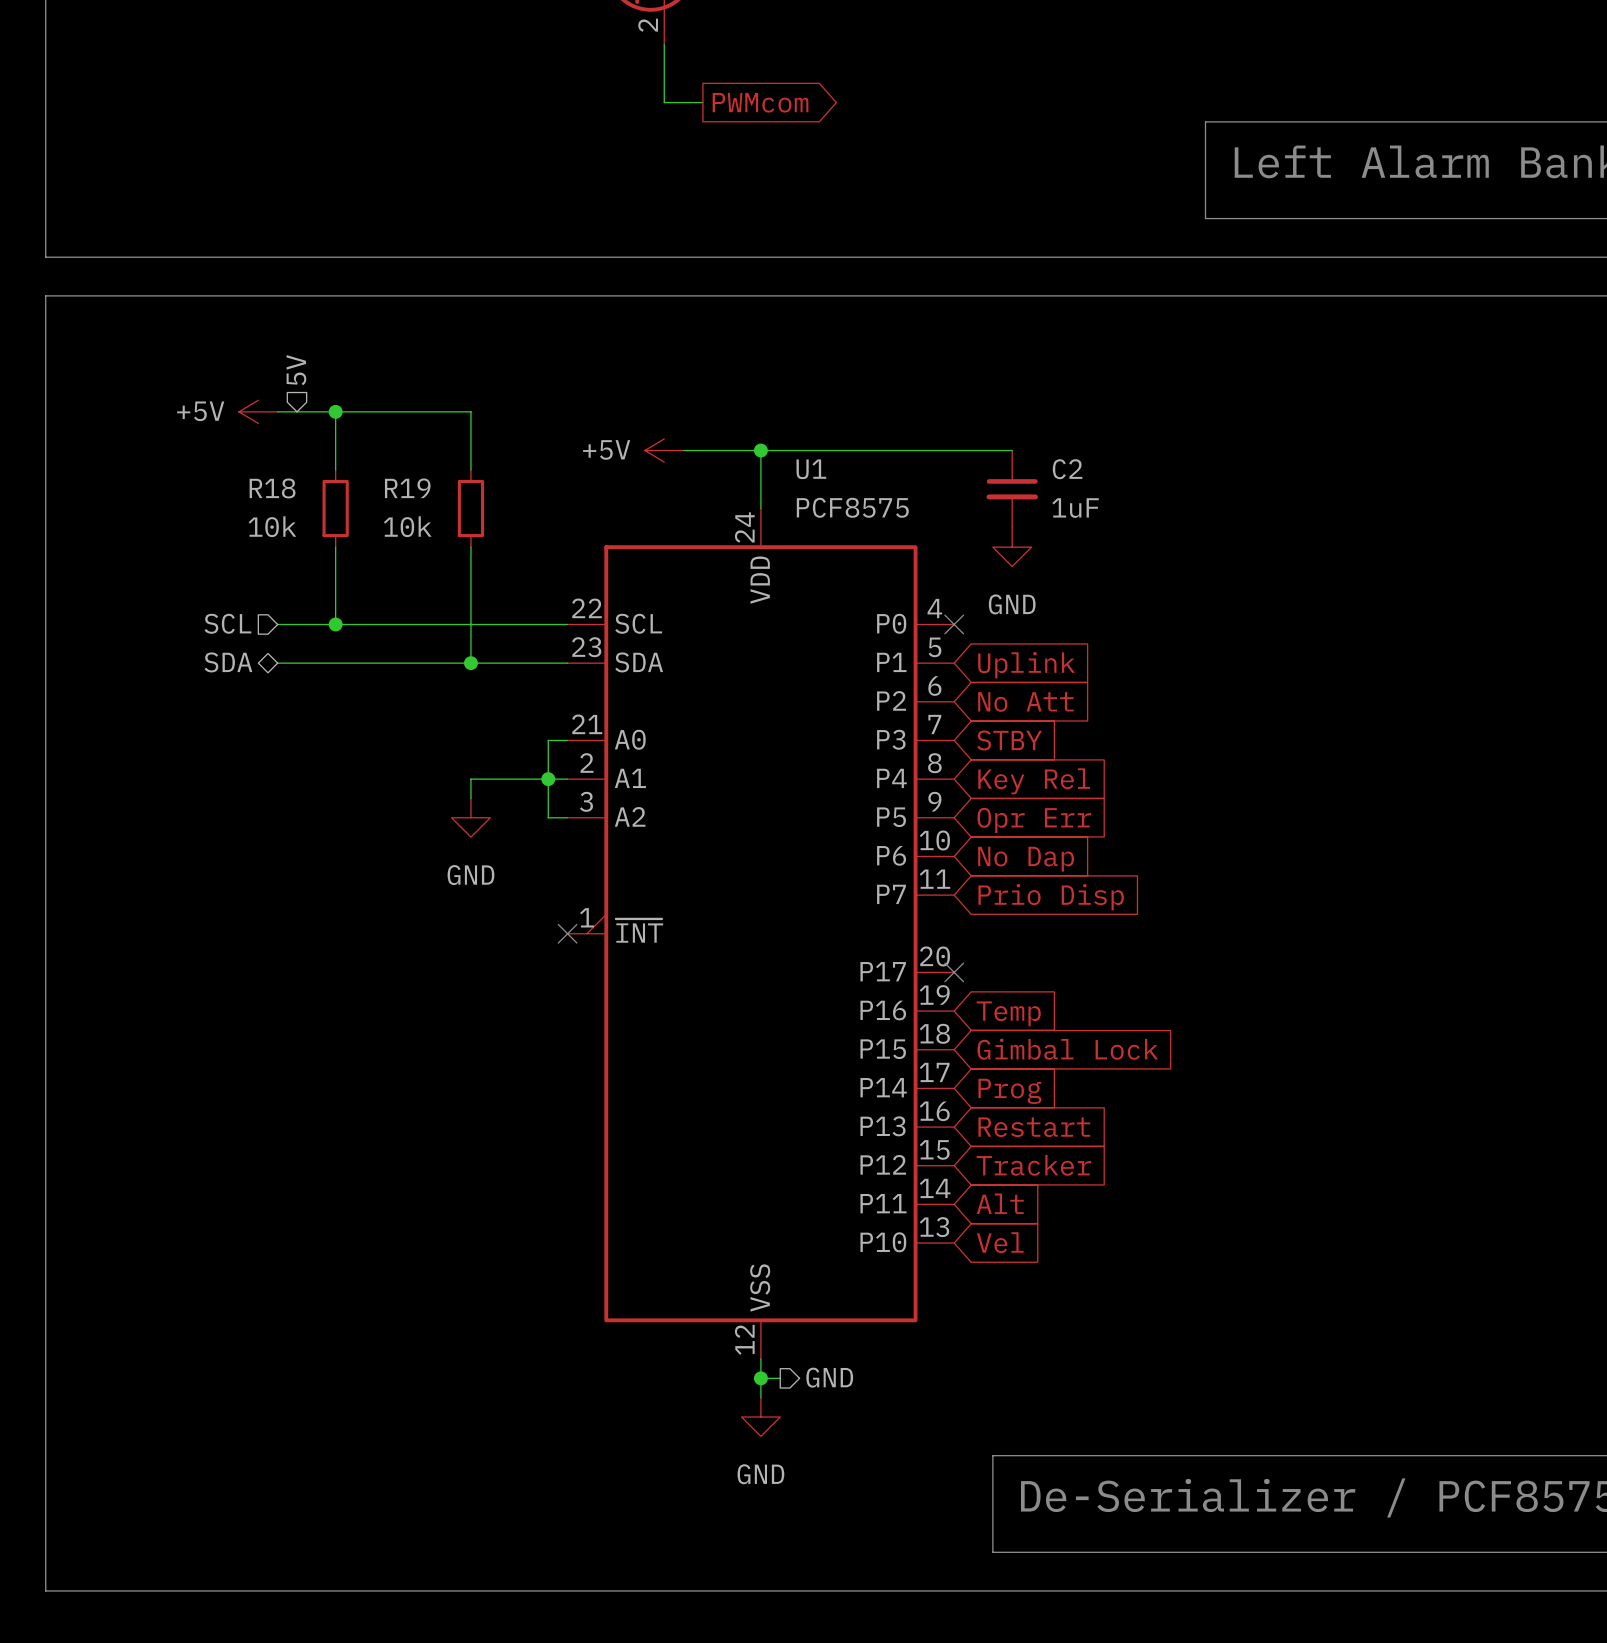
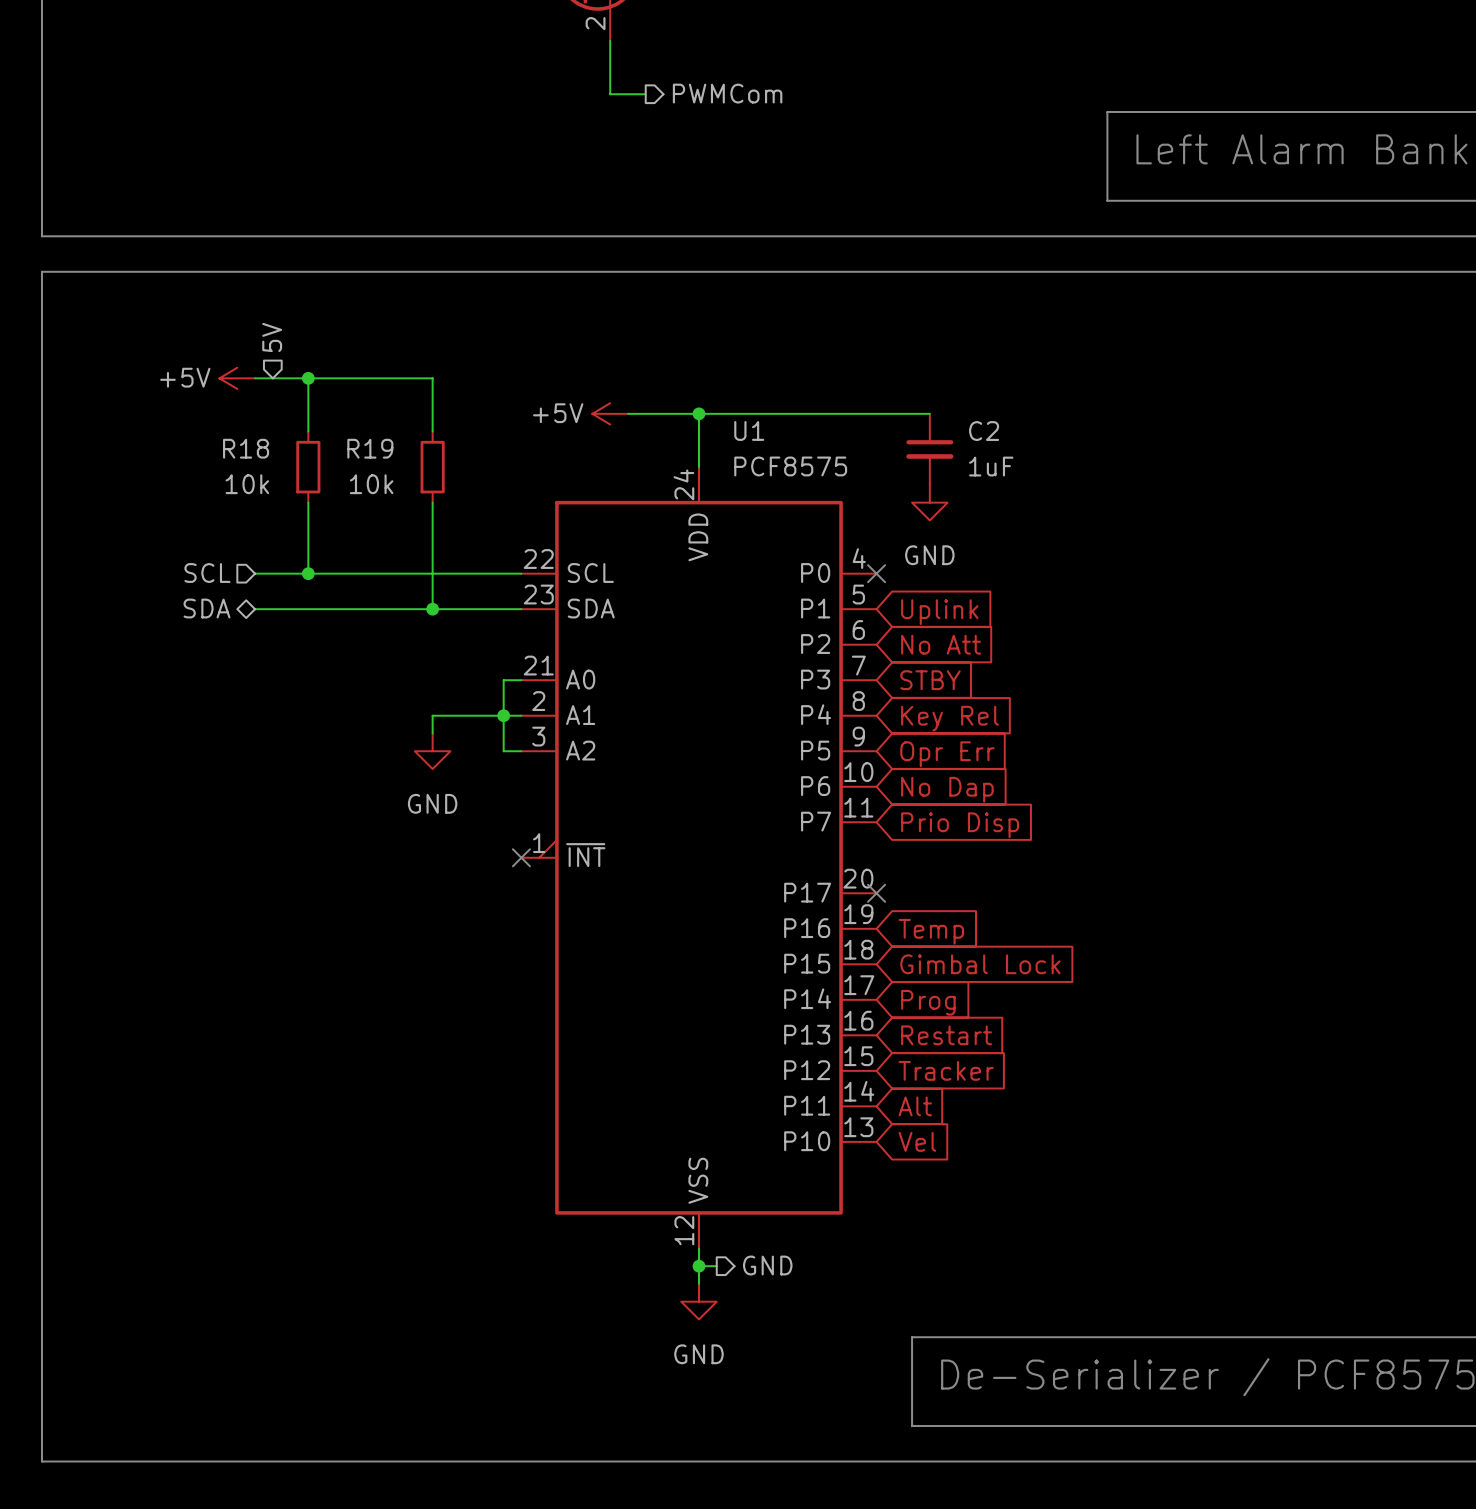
hierarchical label: none -> PWMCom (727, 93)
global label: PWMcom (760, 102) -> none

